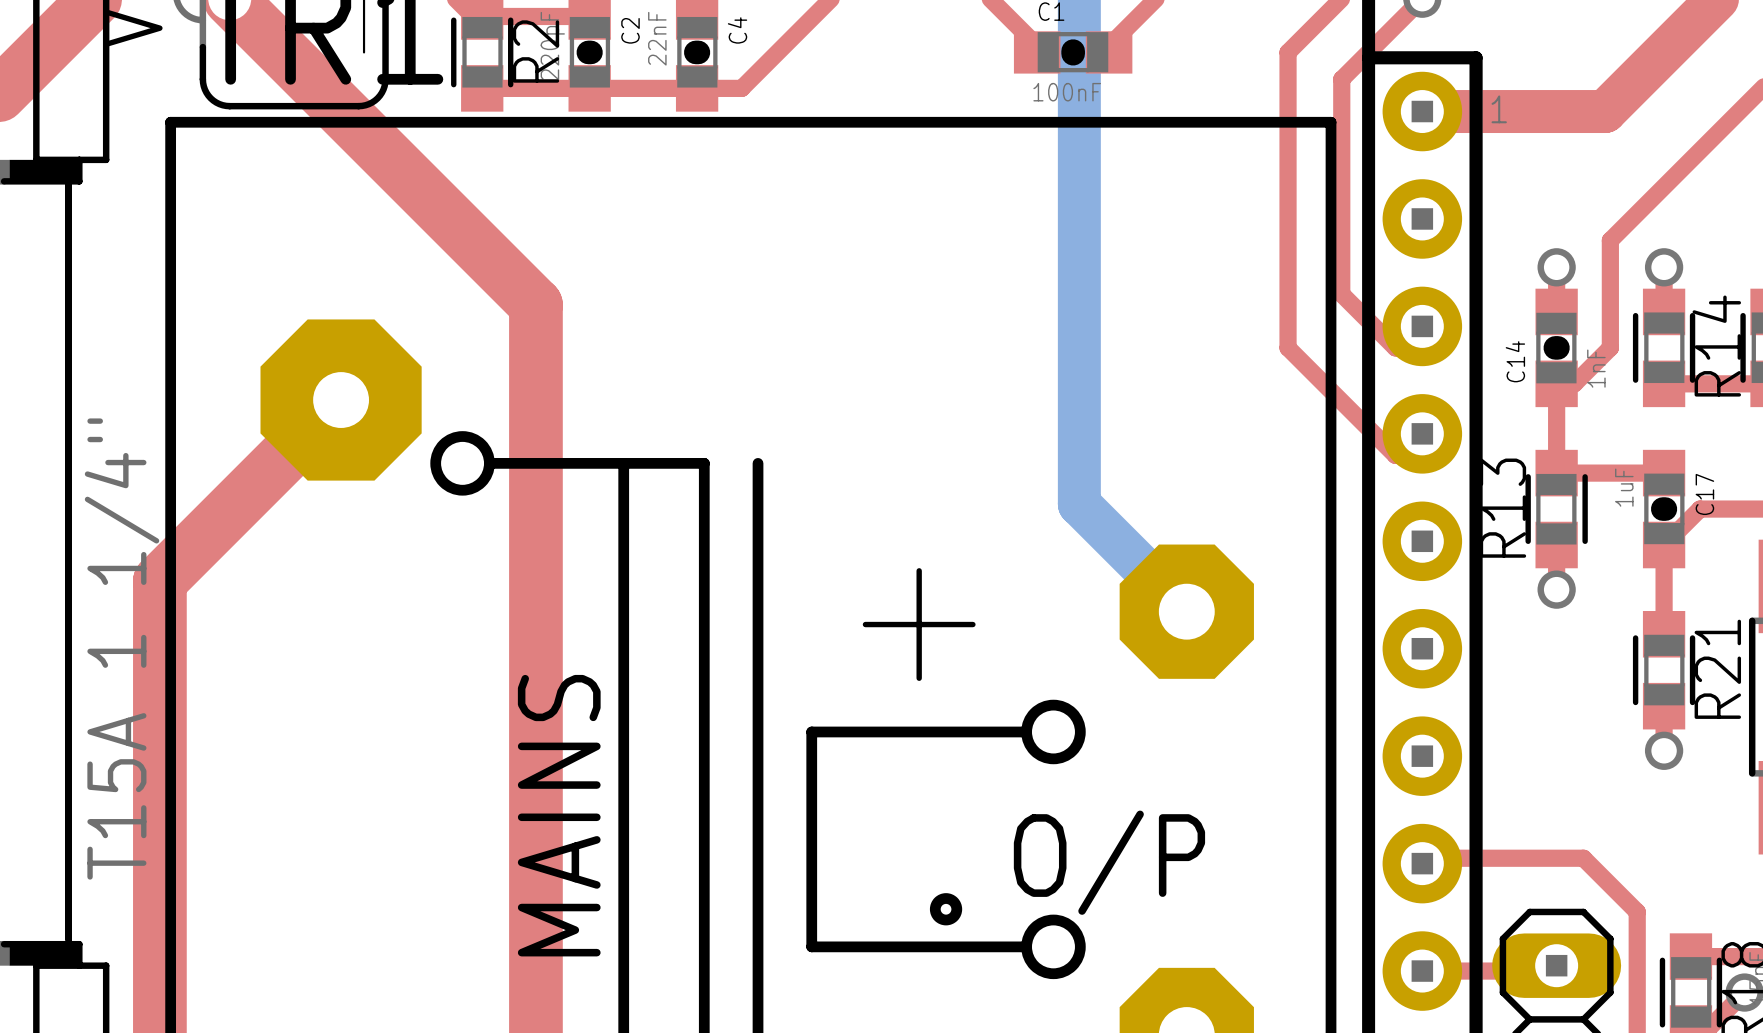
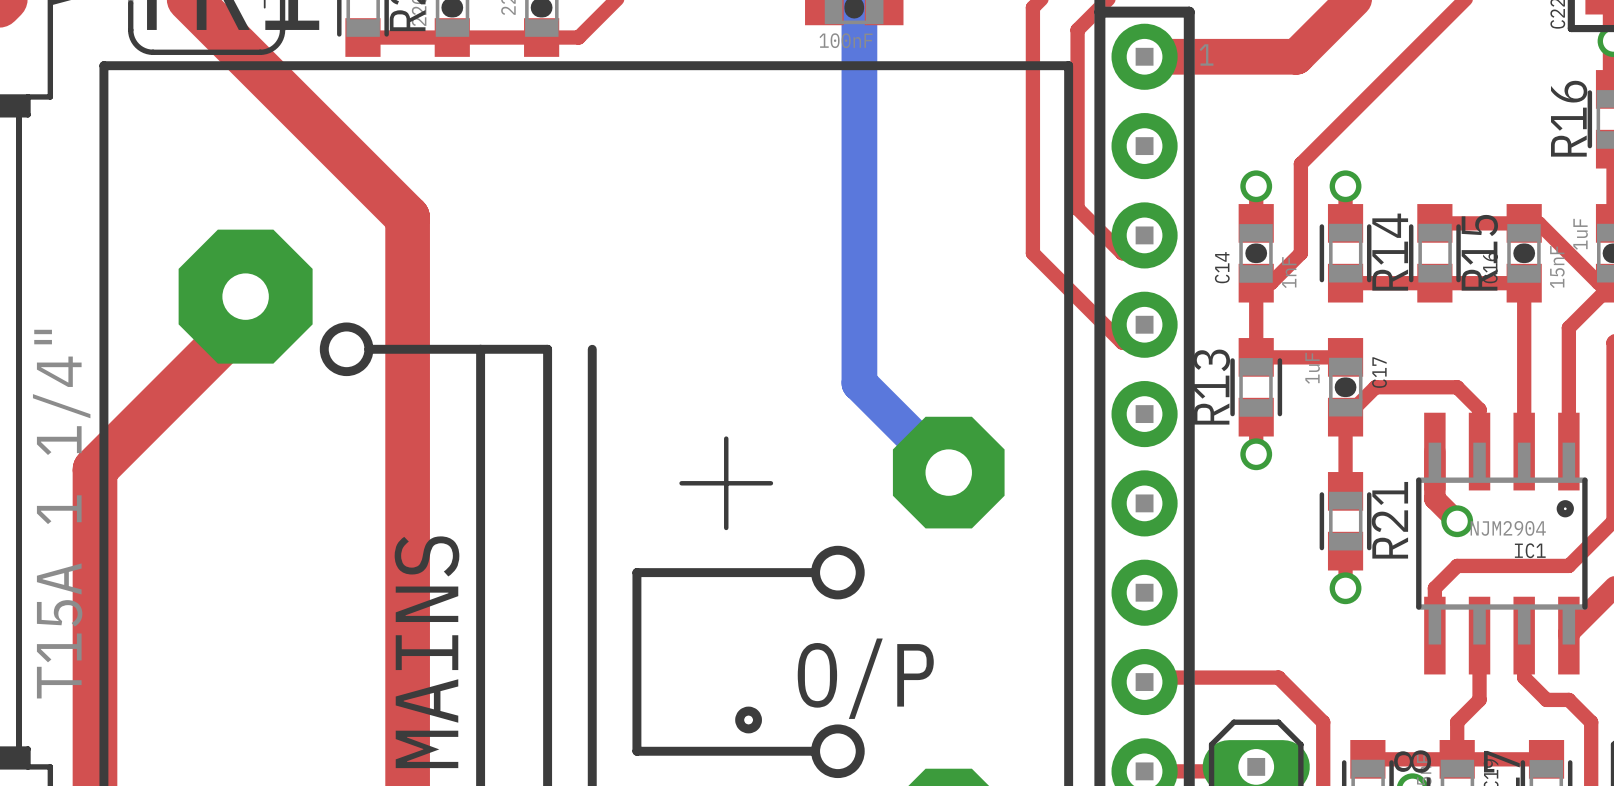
top track: (341, 400) (159, 581) (159, 608) -> (245, 318) (94, 469)

